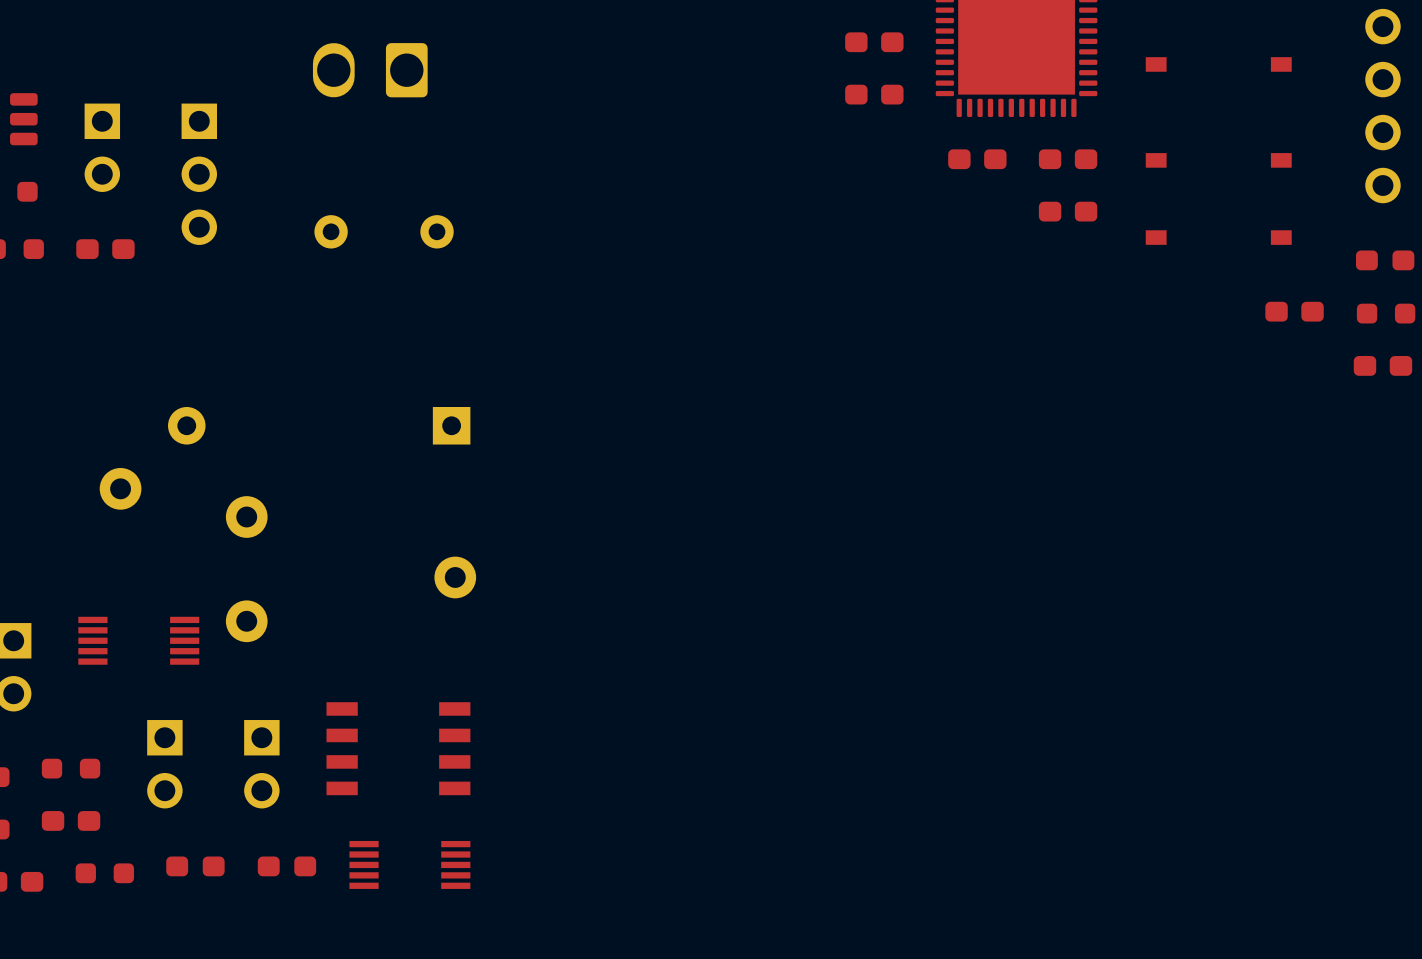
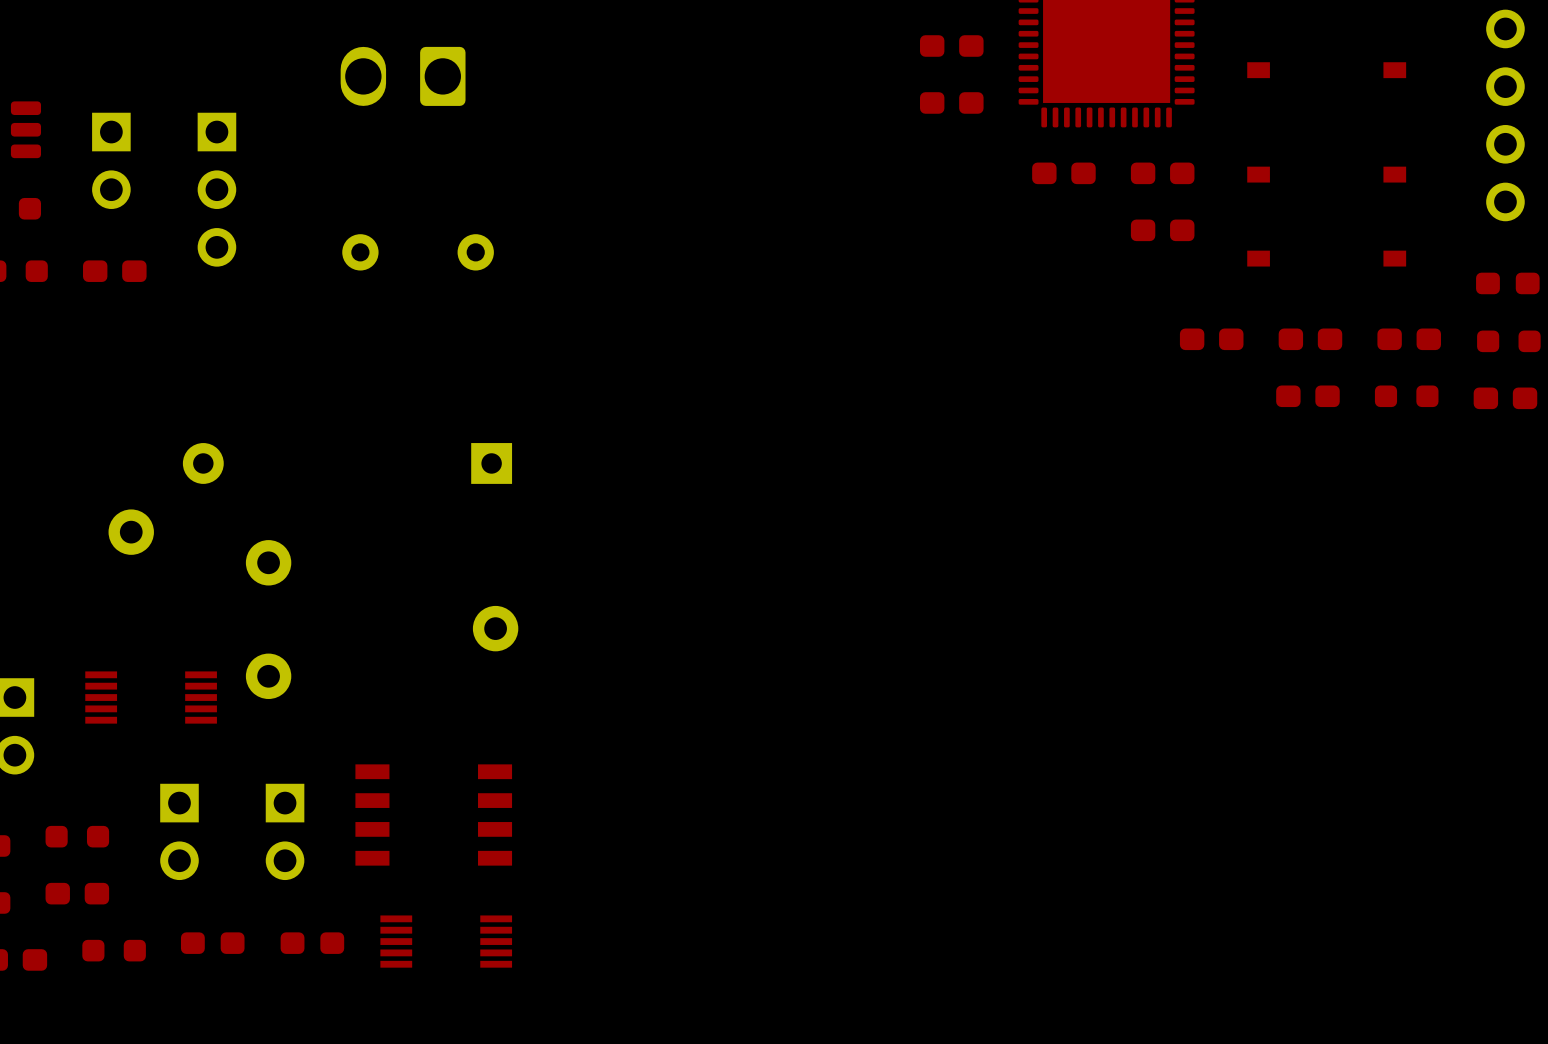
part: none -> (1211, 339)
part: none -> (1310, 339)
part: none -> (1307, 396)
part: none -> (1406, 396)

